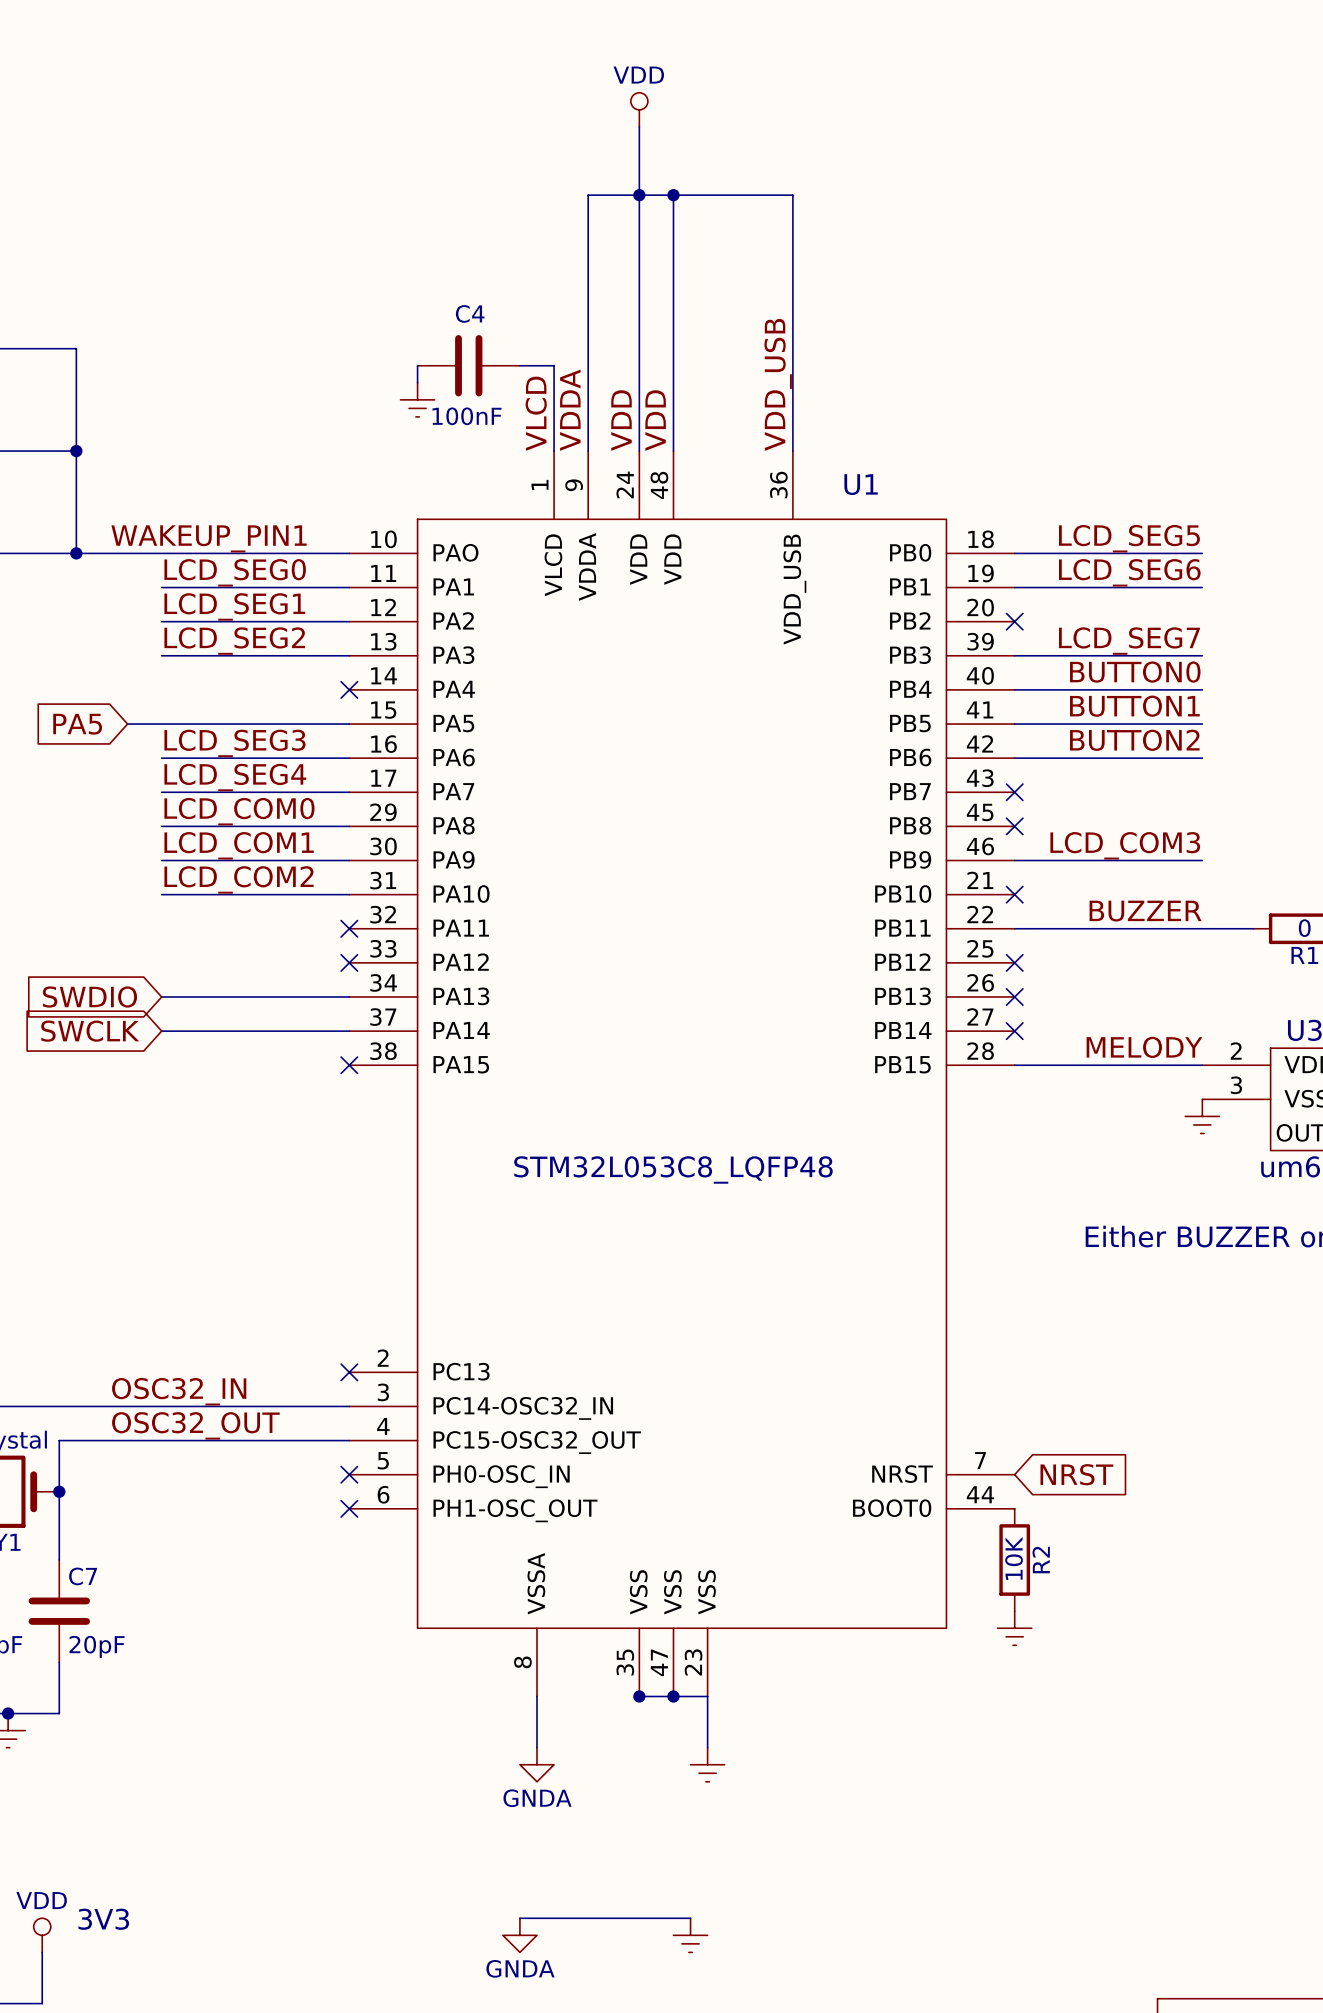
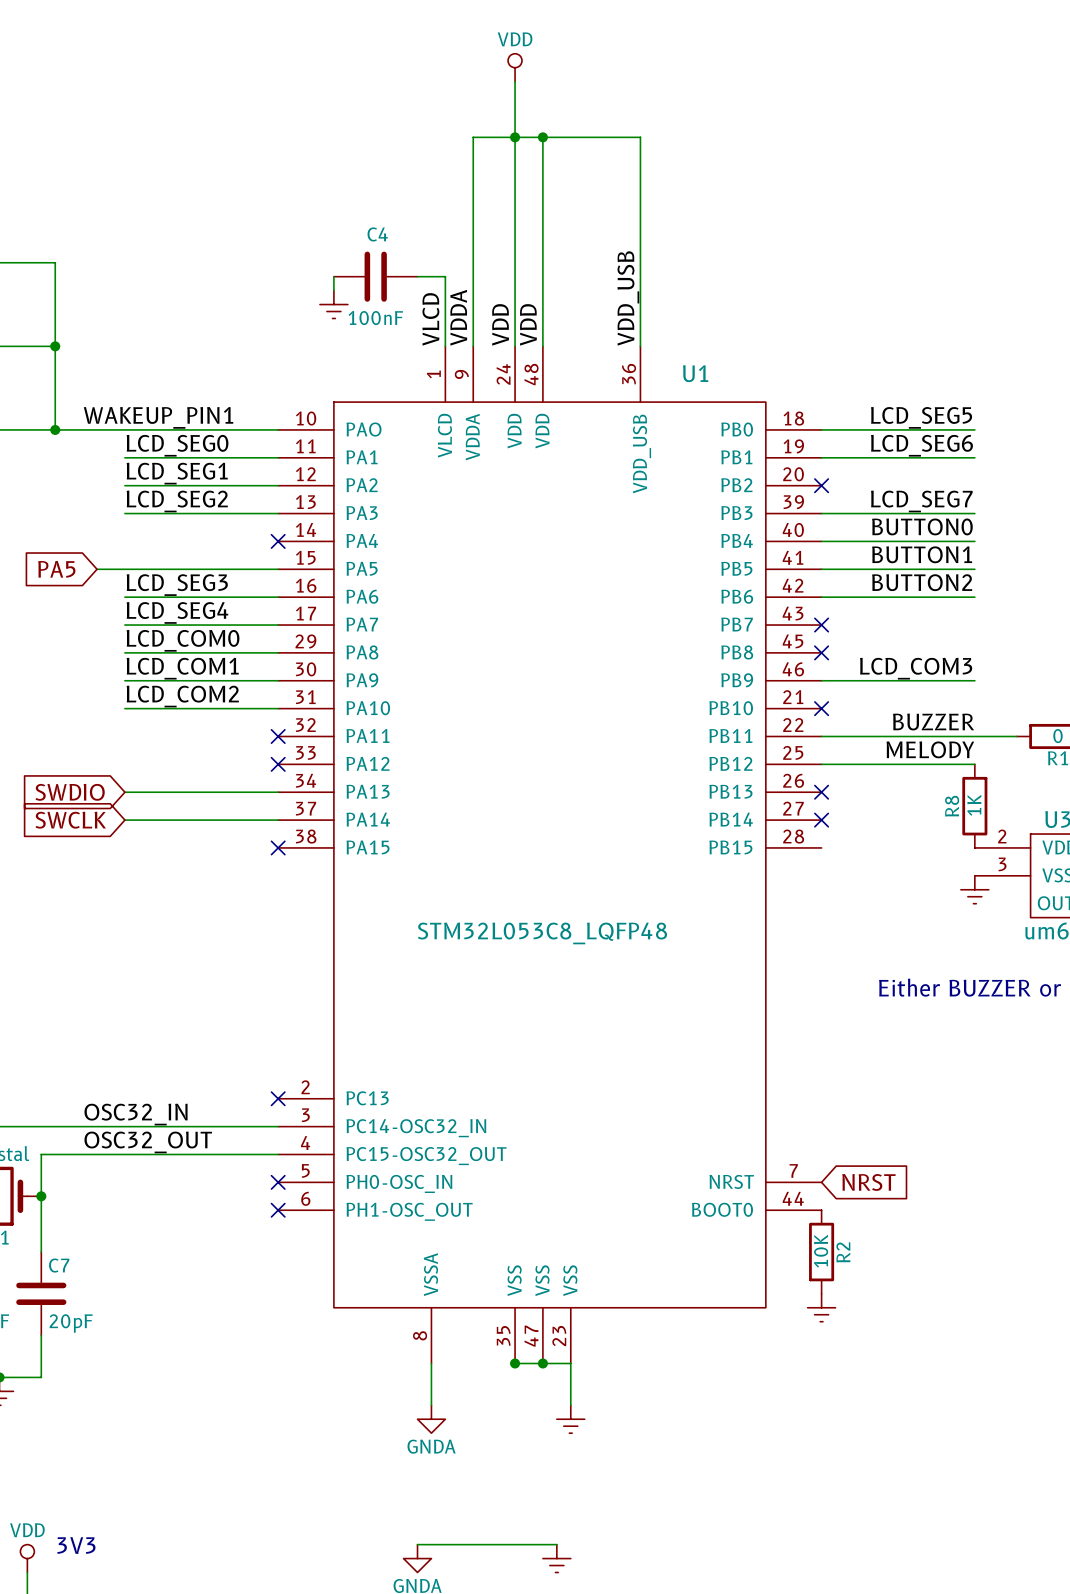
no-connect mark: (1014, 962) -> none
R8: none -> 1K (974, 806)
label position: MELODY (1144, 1047) -> MELODY (930, 749)
wire: (1014, 1065) (1202, 1065) -> (821, 764) (974, 764)

